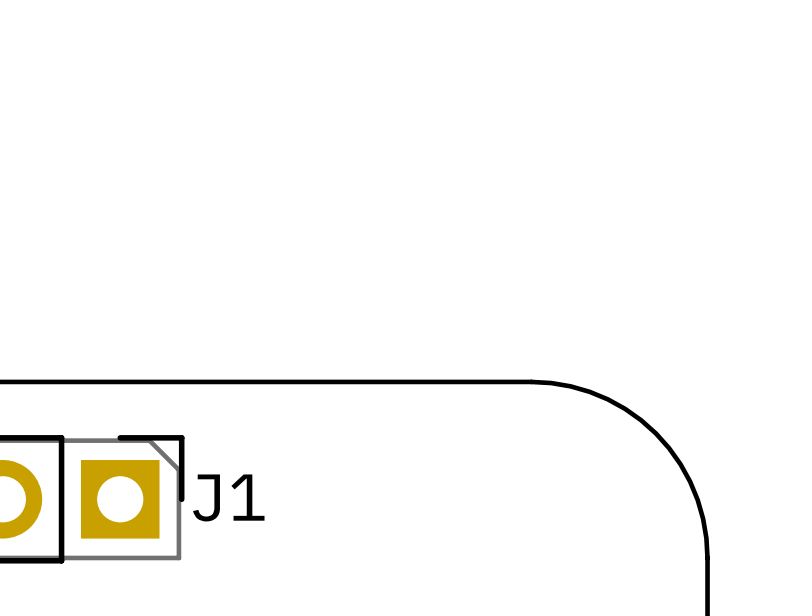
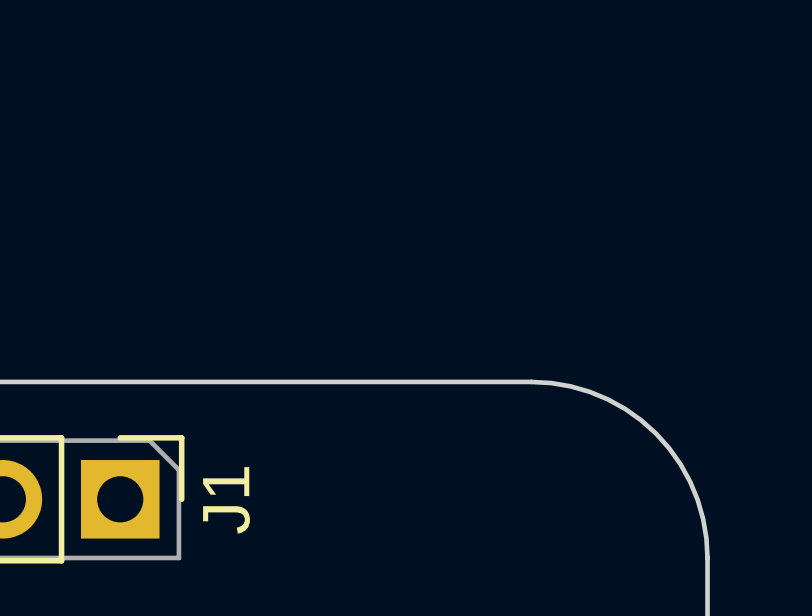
J1 name rotation: 0° (228, 497) -> 90° counterclockwise (226, 500)

